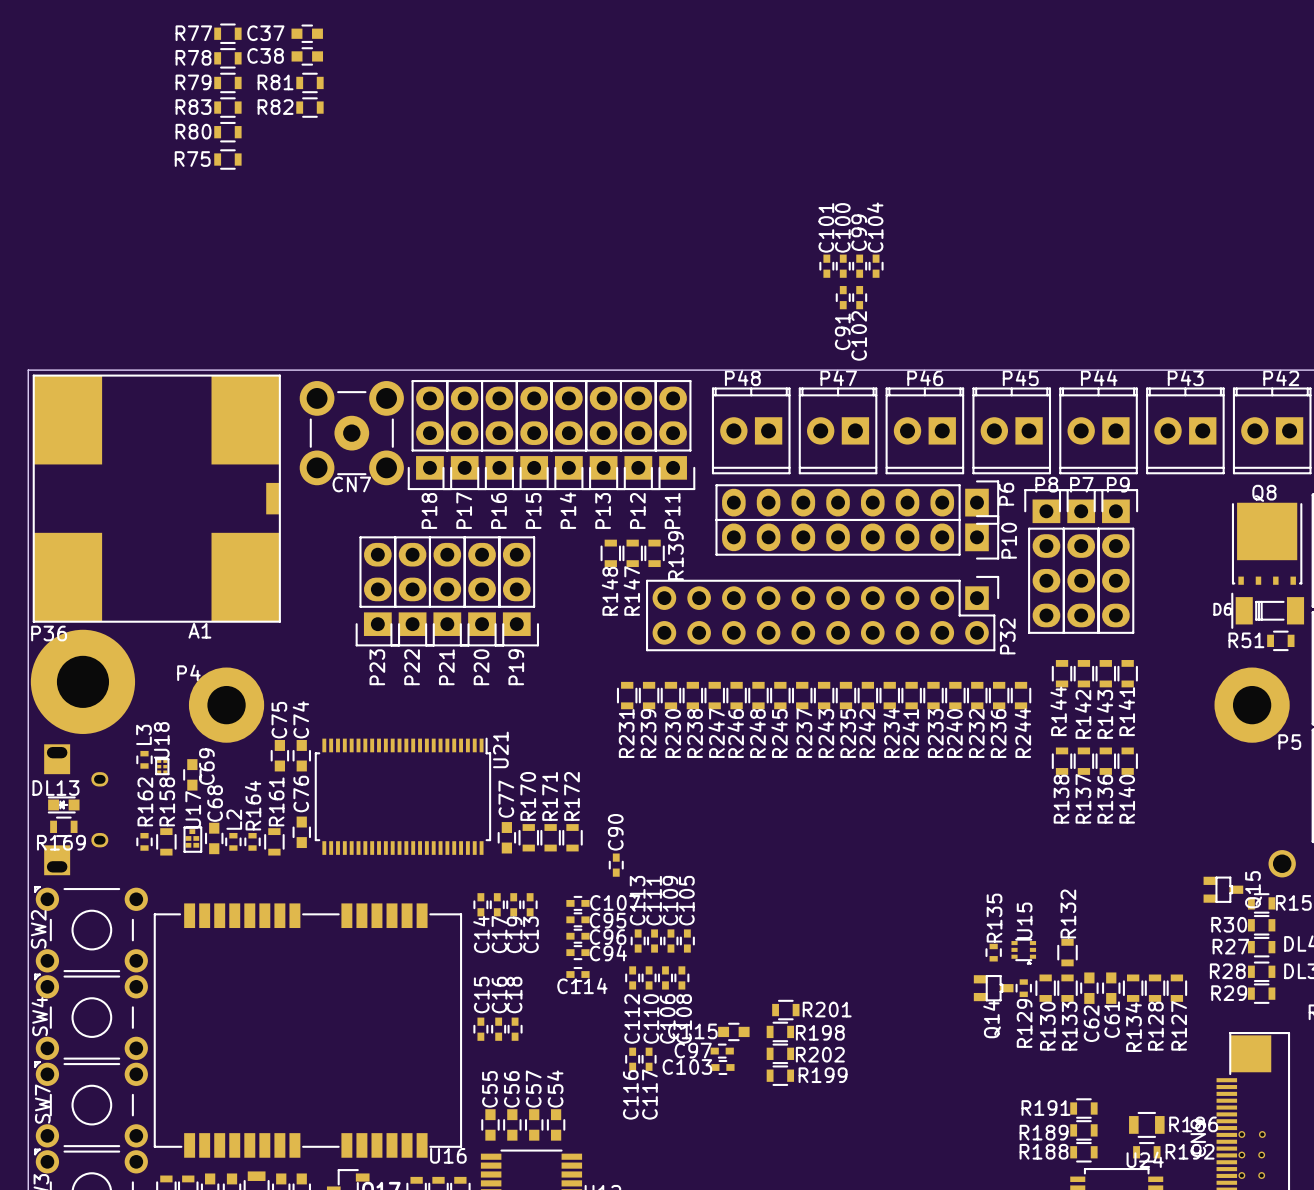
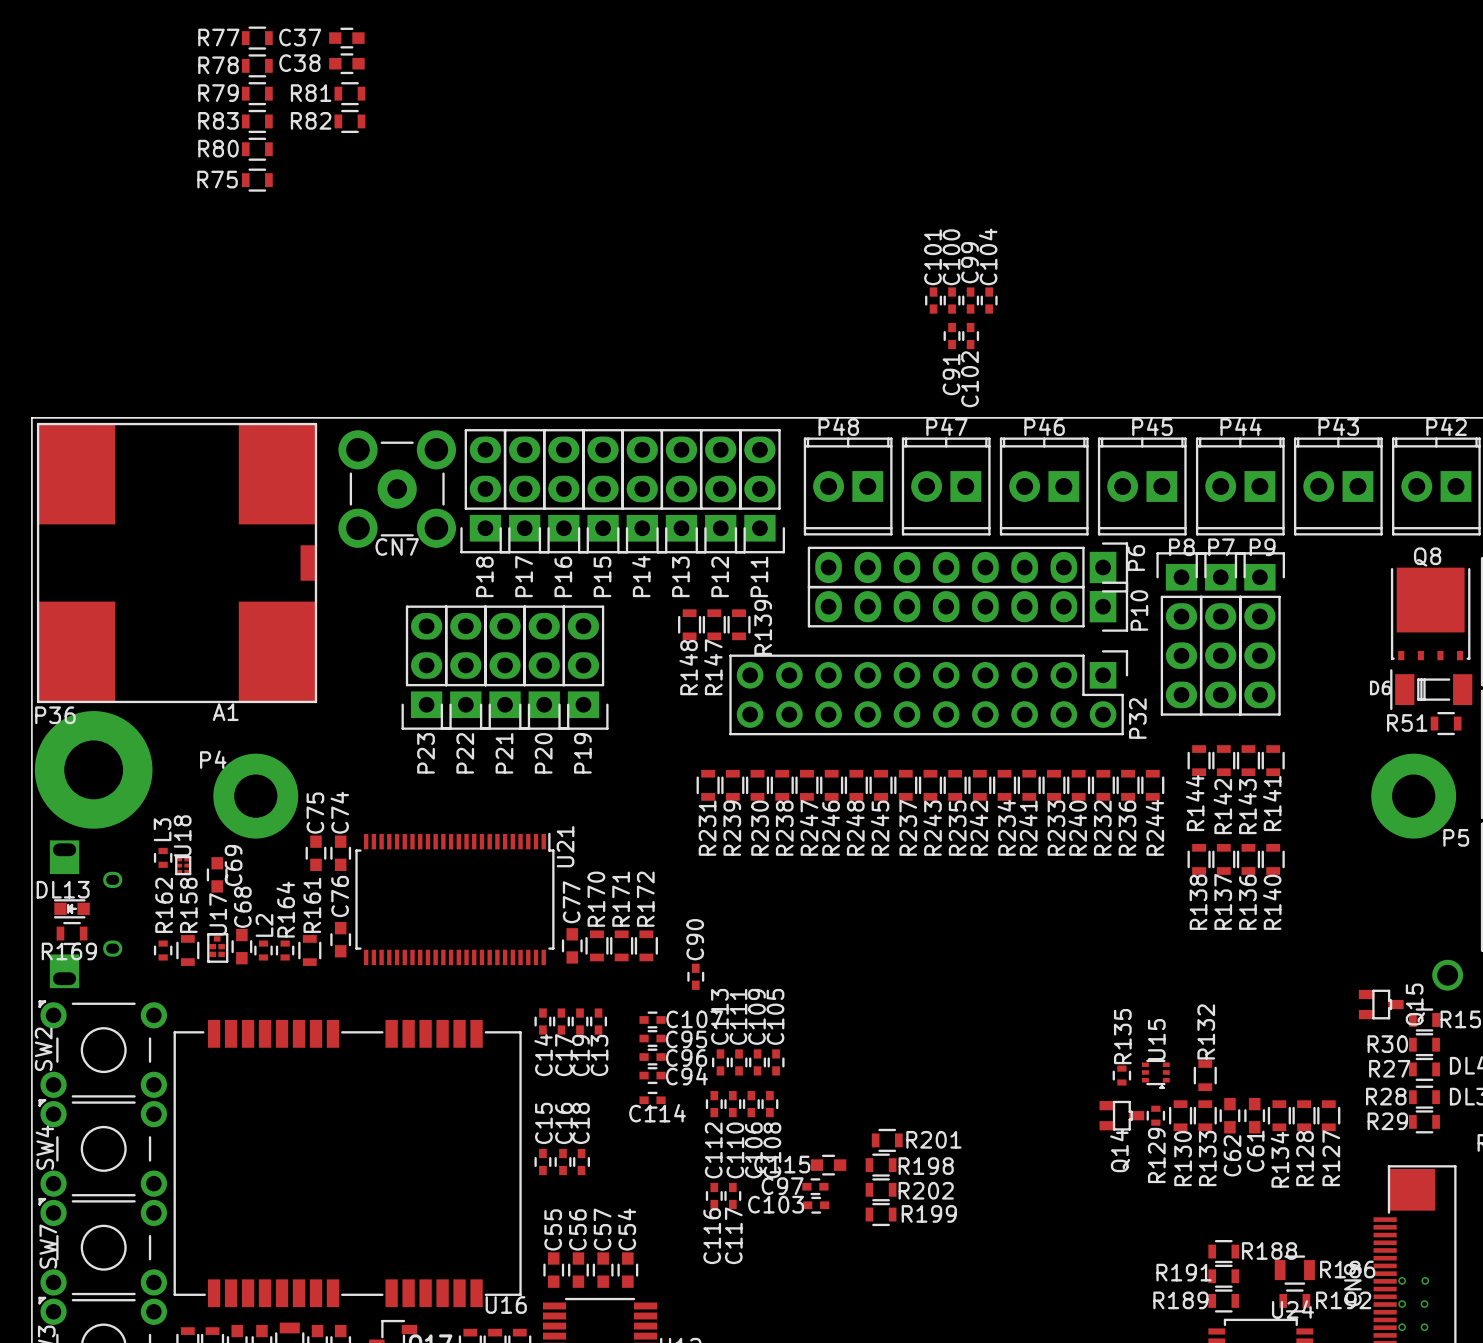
R191 name: R191 (1045, 1108) -> R188 (1269, 1250)
R189 name: R189 (1044, 1132) -> R191 (1184, 1272)
R188 name: R188 (1044, 1151) -> R189 (1180, 1300)

